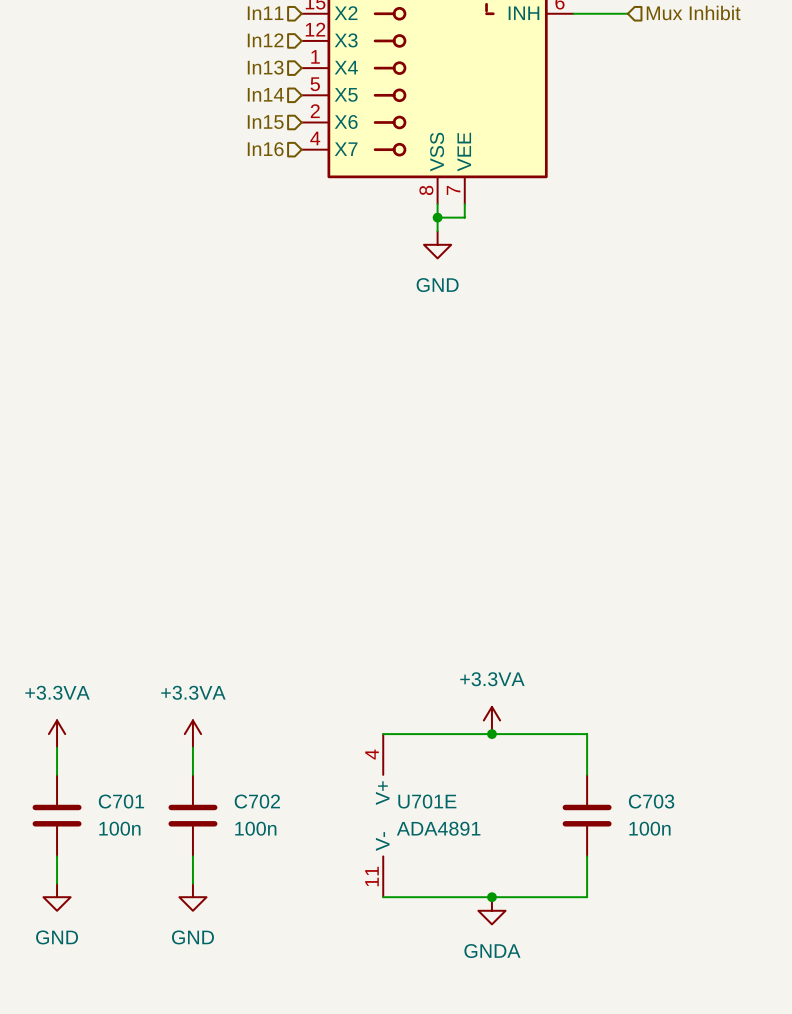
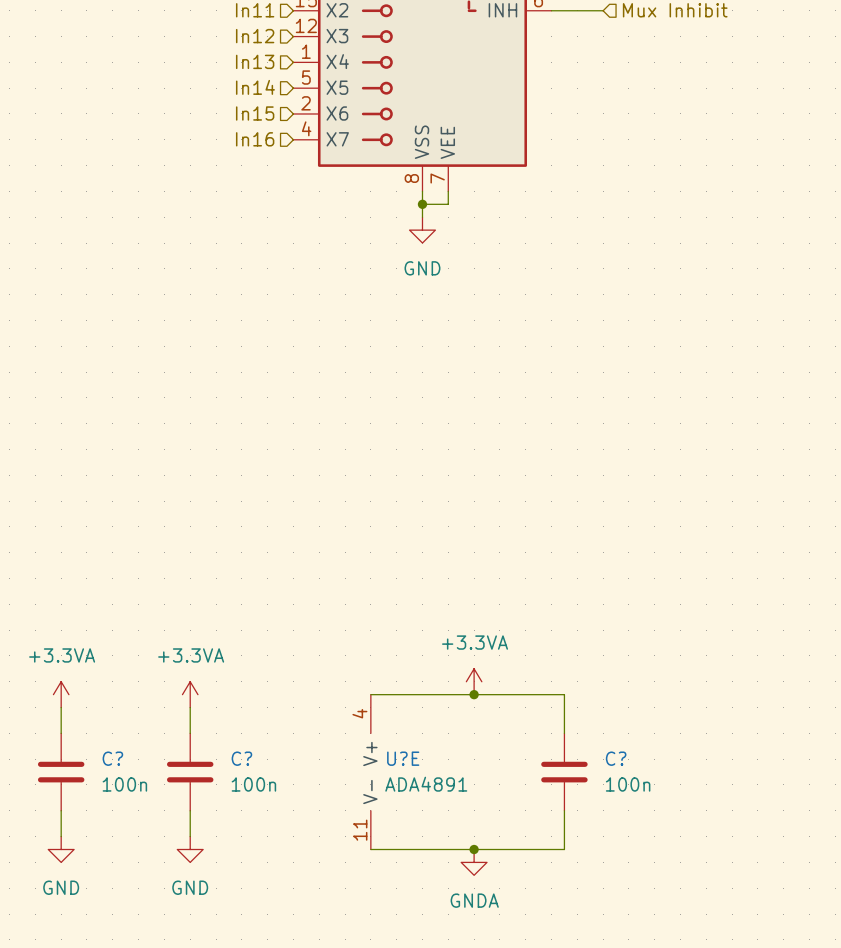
C701 name: C701 (121, 801) -> C? (112, 758)
C702 name: C702 (257, 801) -> C? (241, 758)
U701E name: U701E (427, 801) -> U?E (403, 758)
C703 name: C703 (651, 801) -> C? (616, 758)

